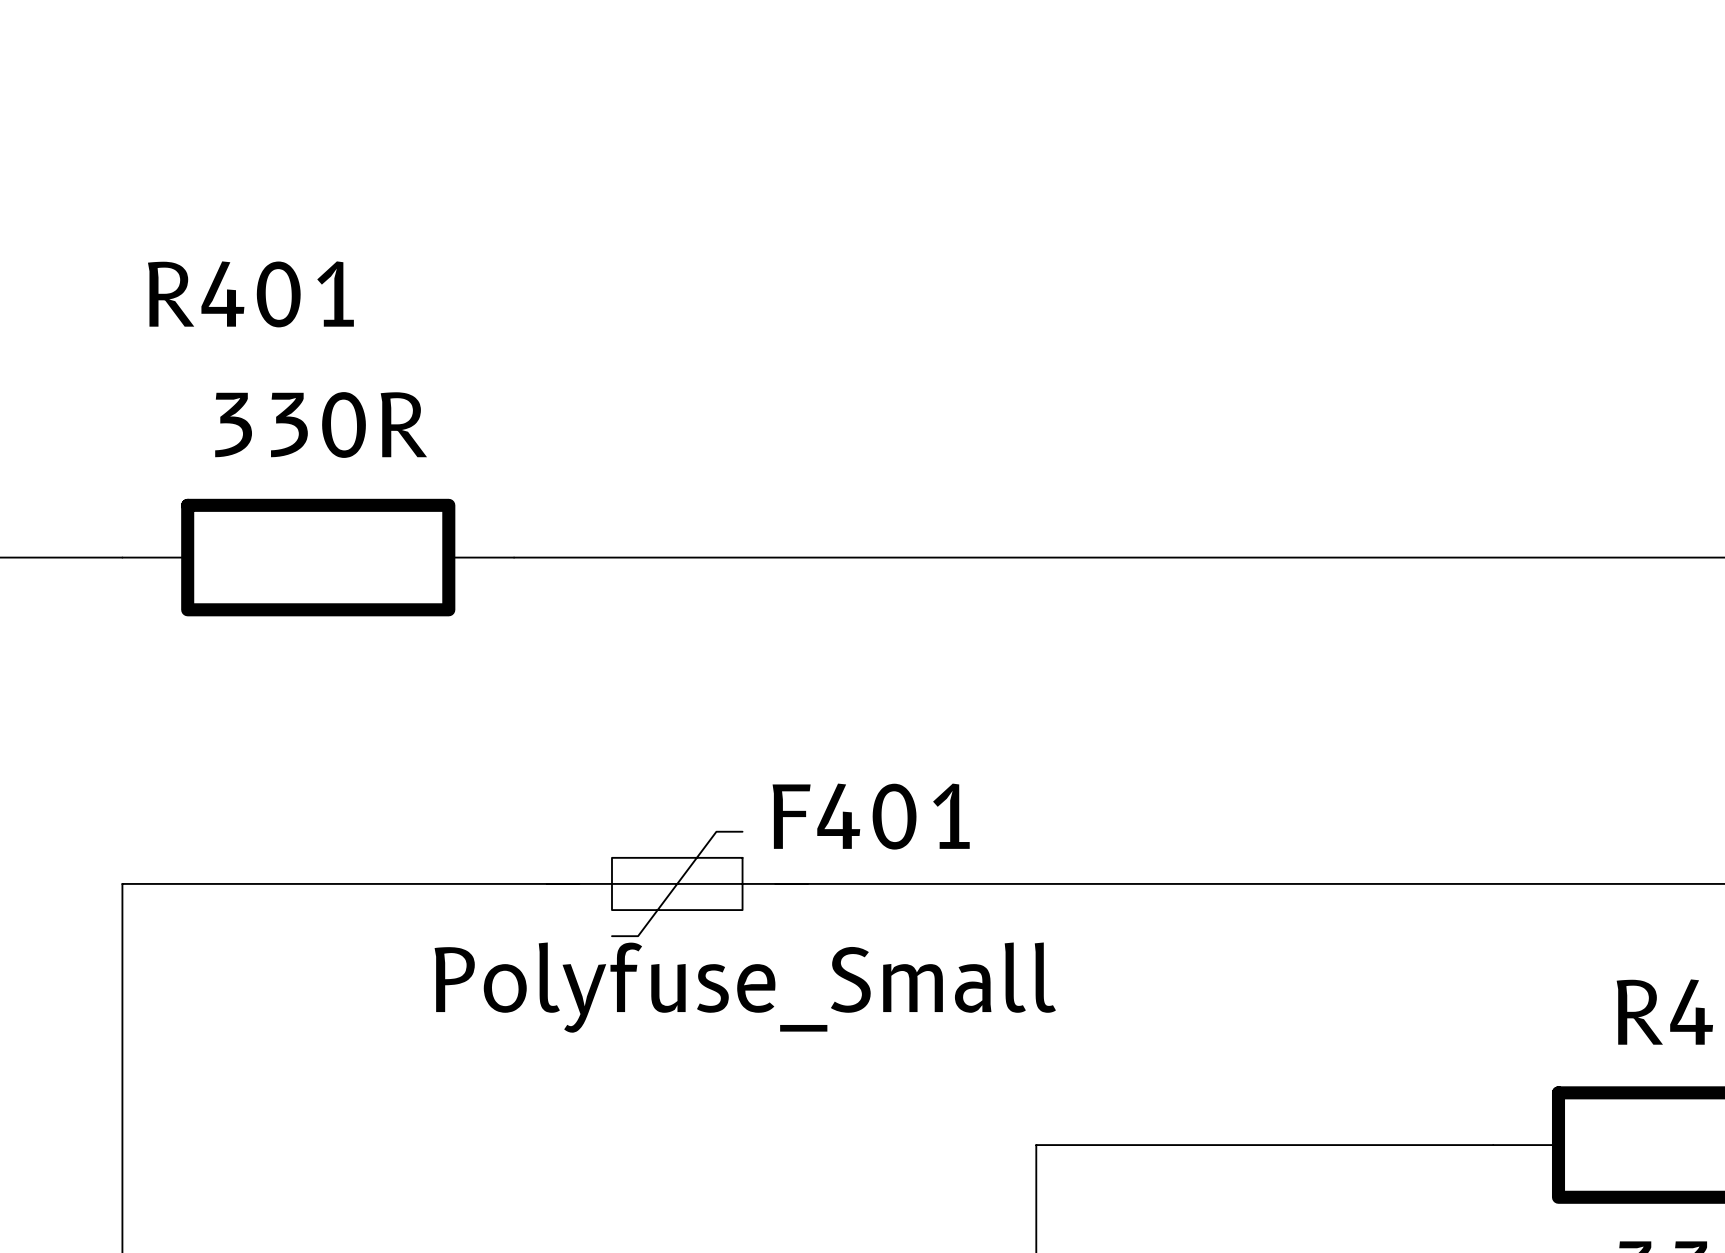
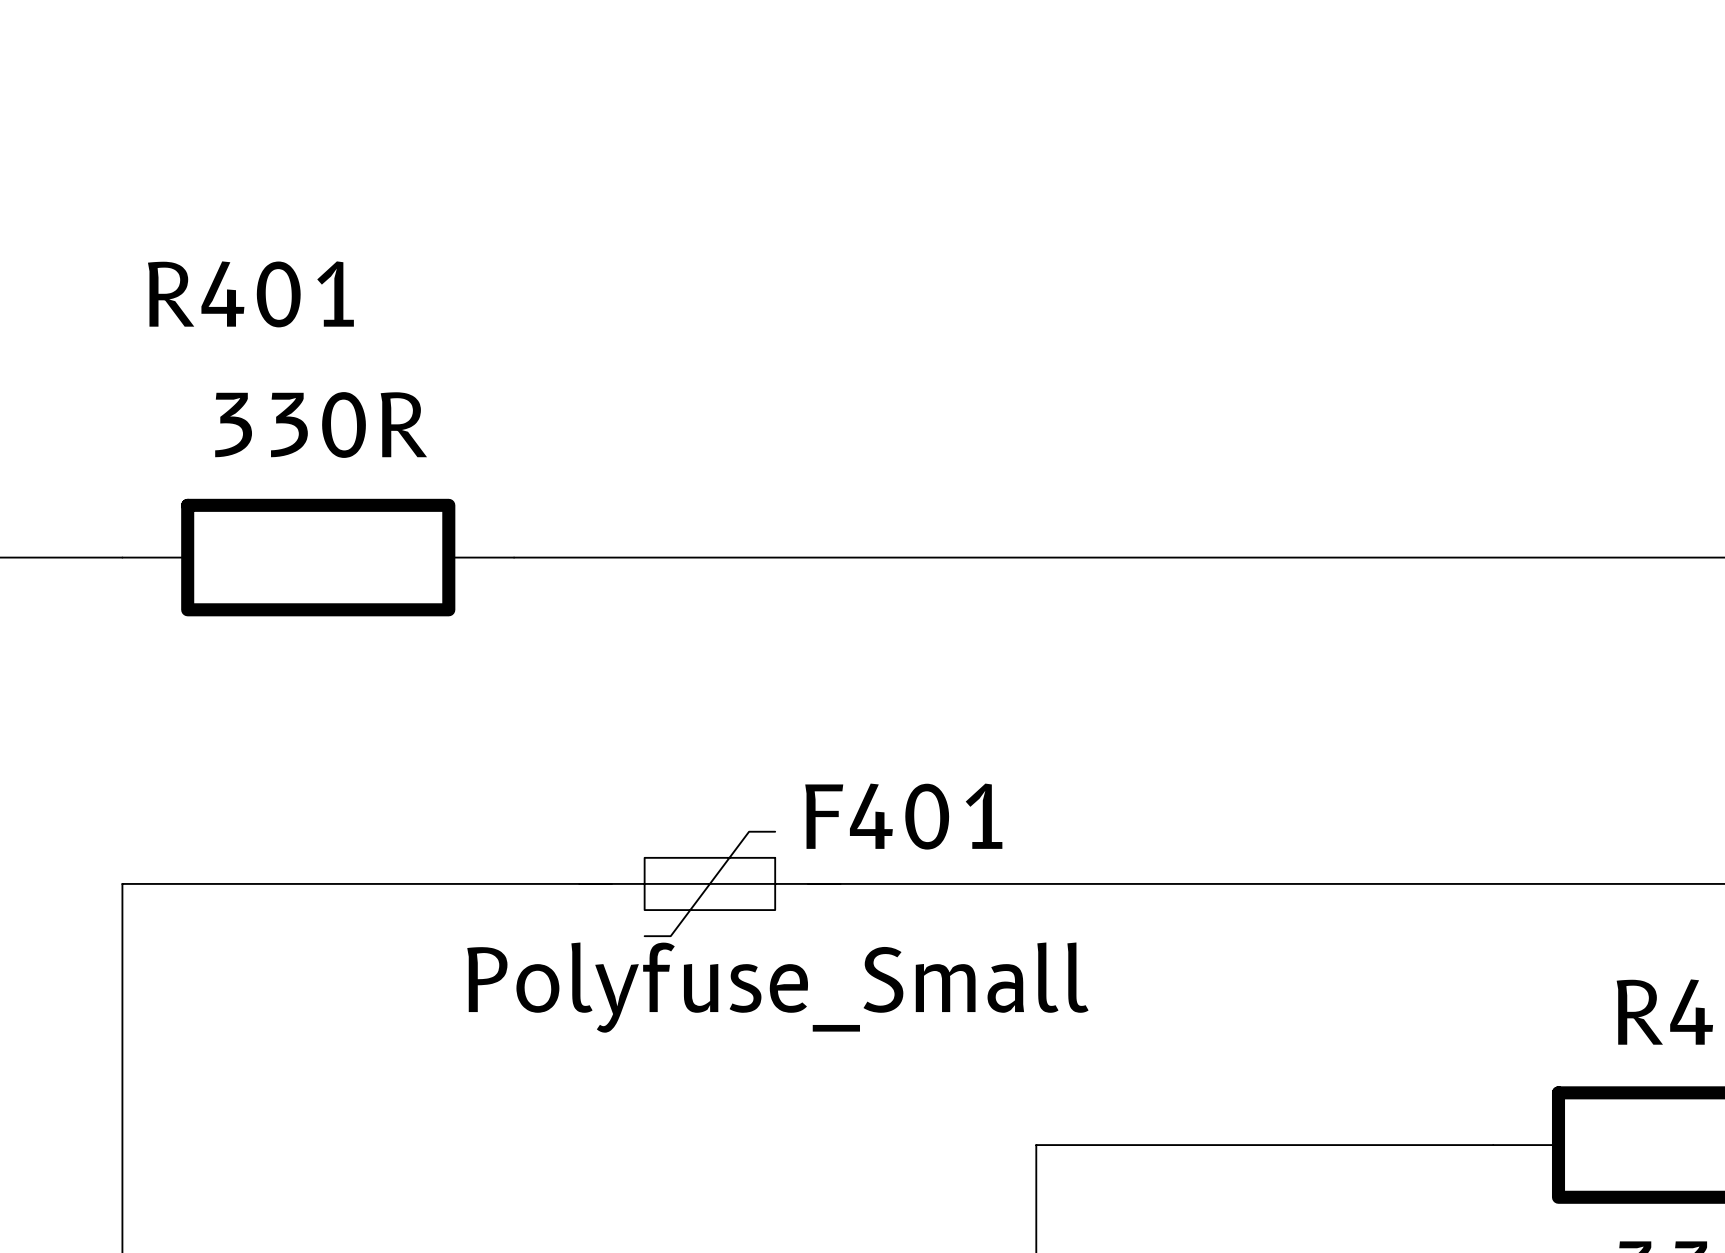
F401 position: (677, 883) -> (709, 883)

